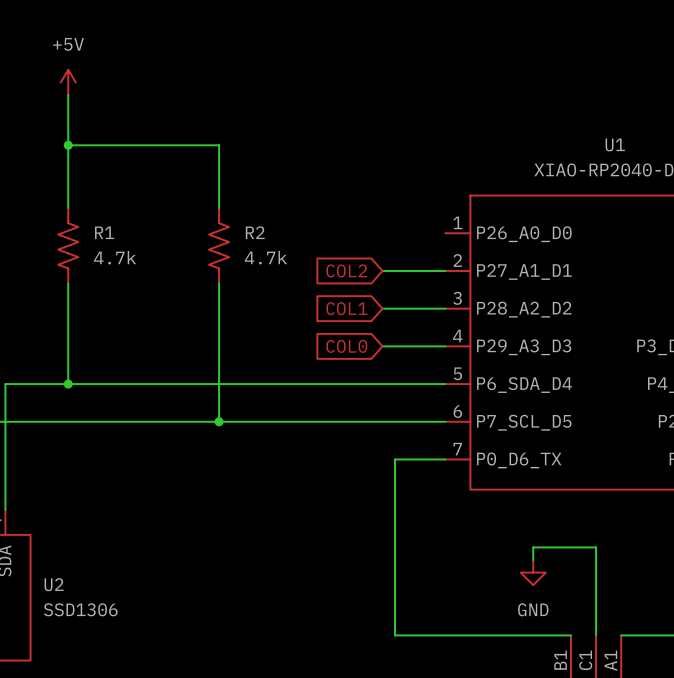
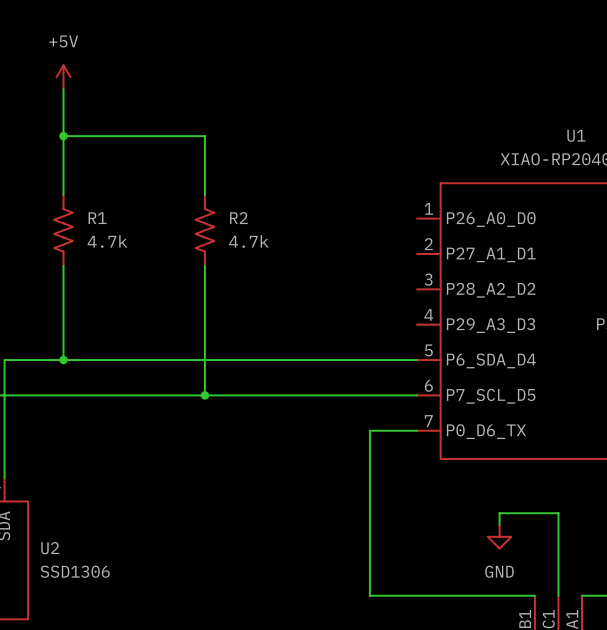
global label: COL2 (346, 270) -> none
wire: (382, 270) (445, 270) -> none
global label: COL1 (346, 308) -> none
wire: (382, 308) (445, 308) -> none
global label: COL0 (346, 346) -> none
wire: (382, 346) (445, 346) -> none

